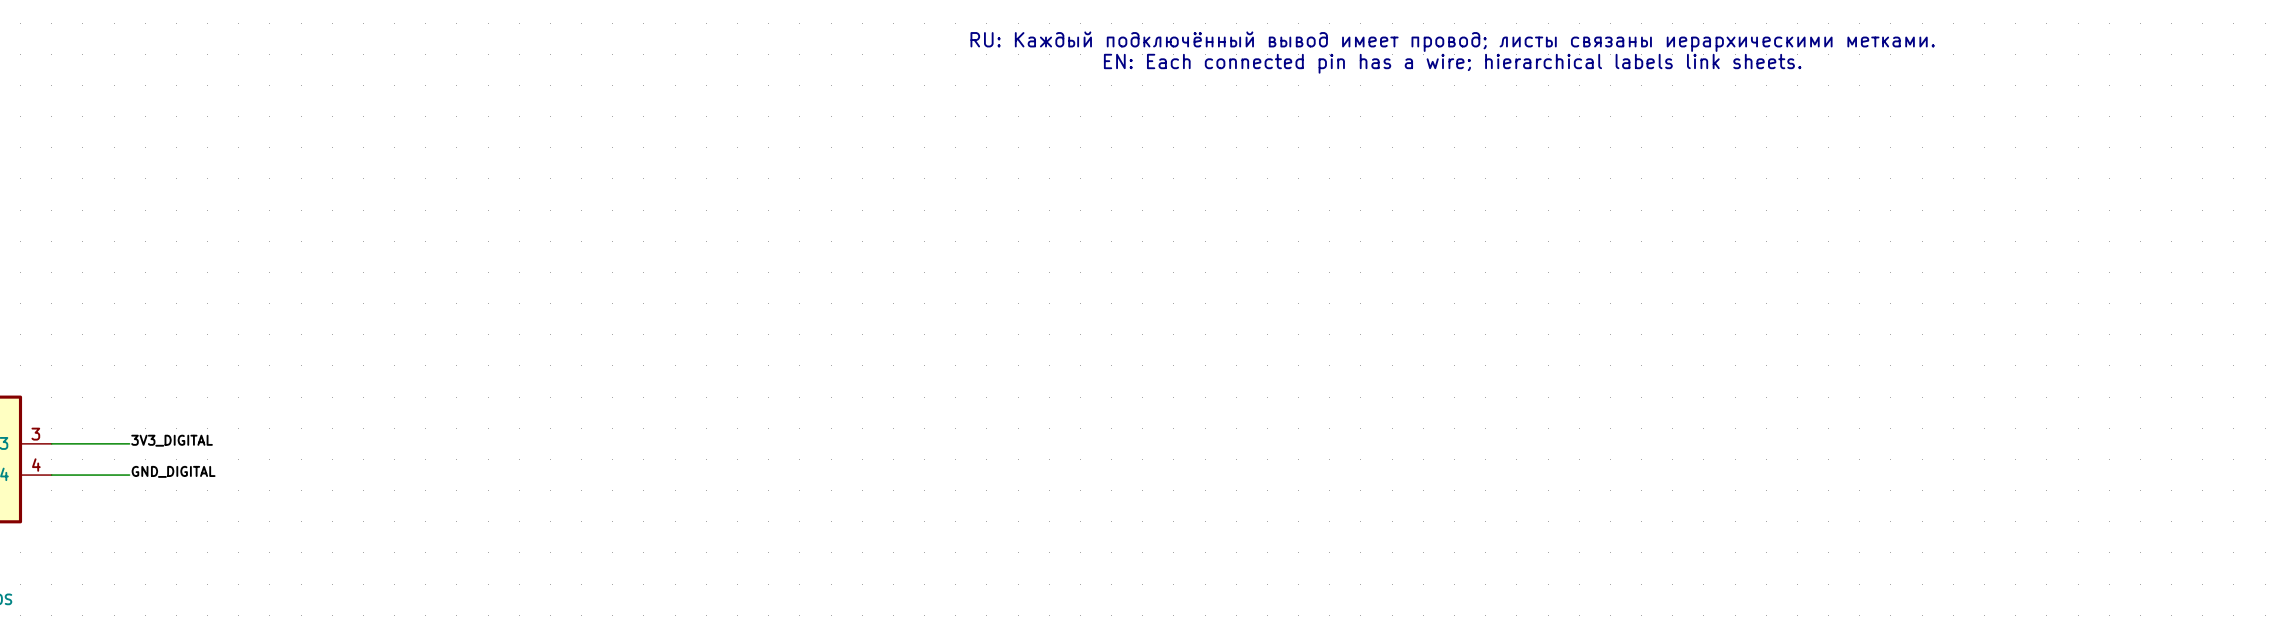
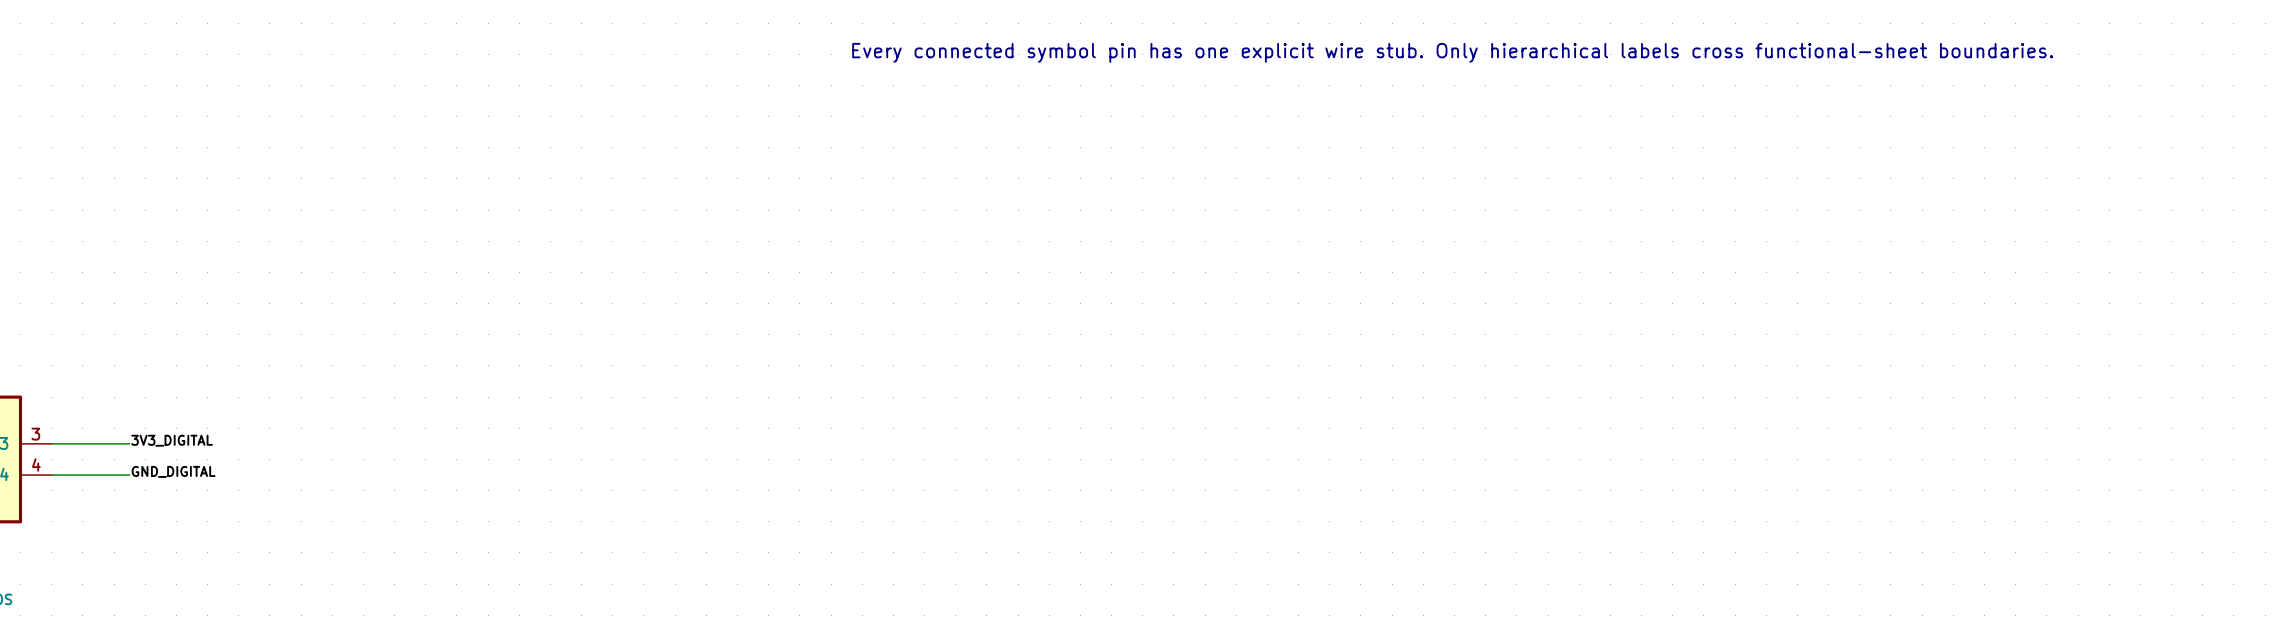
text: RU: Каждый подключённый вывод имеет провод; листы связаны иерархическими метками. (1452, 41) -> none
text: none -> Every connected symbol pin has one explicit wire stub. Only hierarchical labels cross functional-sheet boundaries. (1452, 52)
text: EN: Each connected pin has a wire; hierarchical labels link sheets. (1452, 63) -> none

